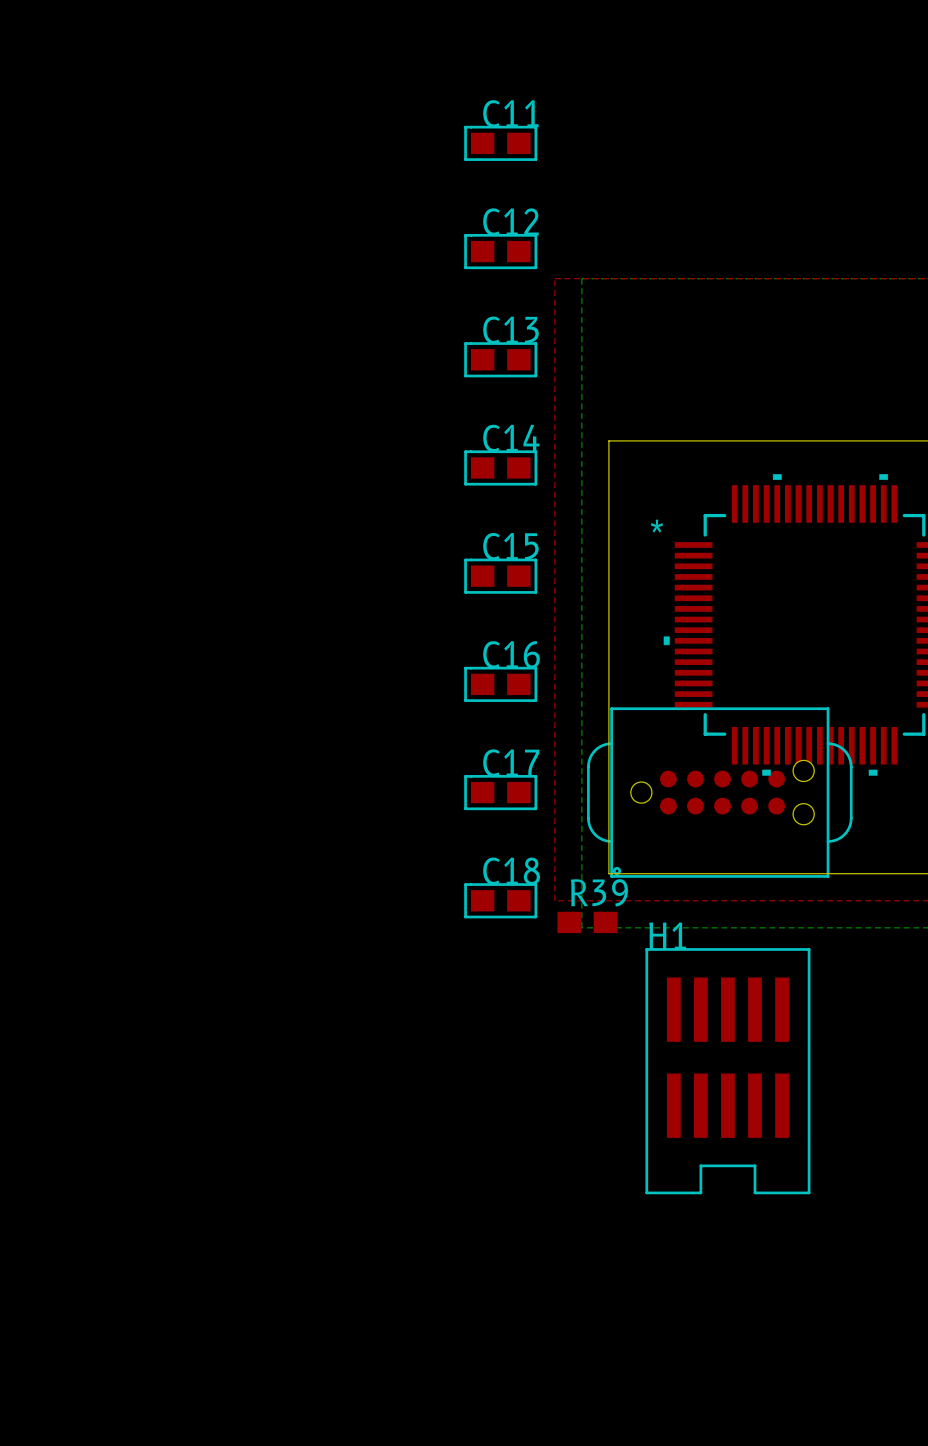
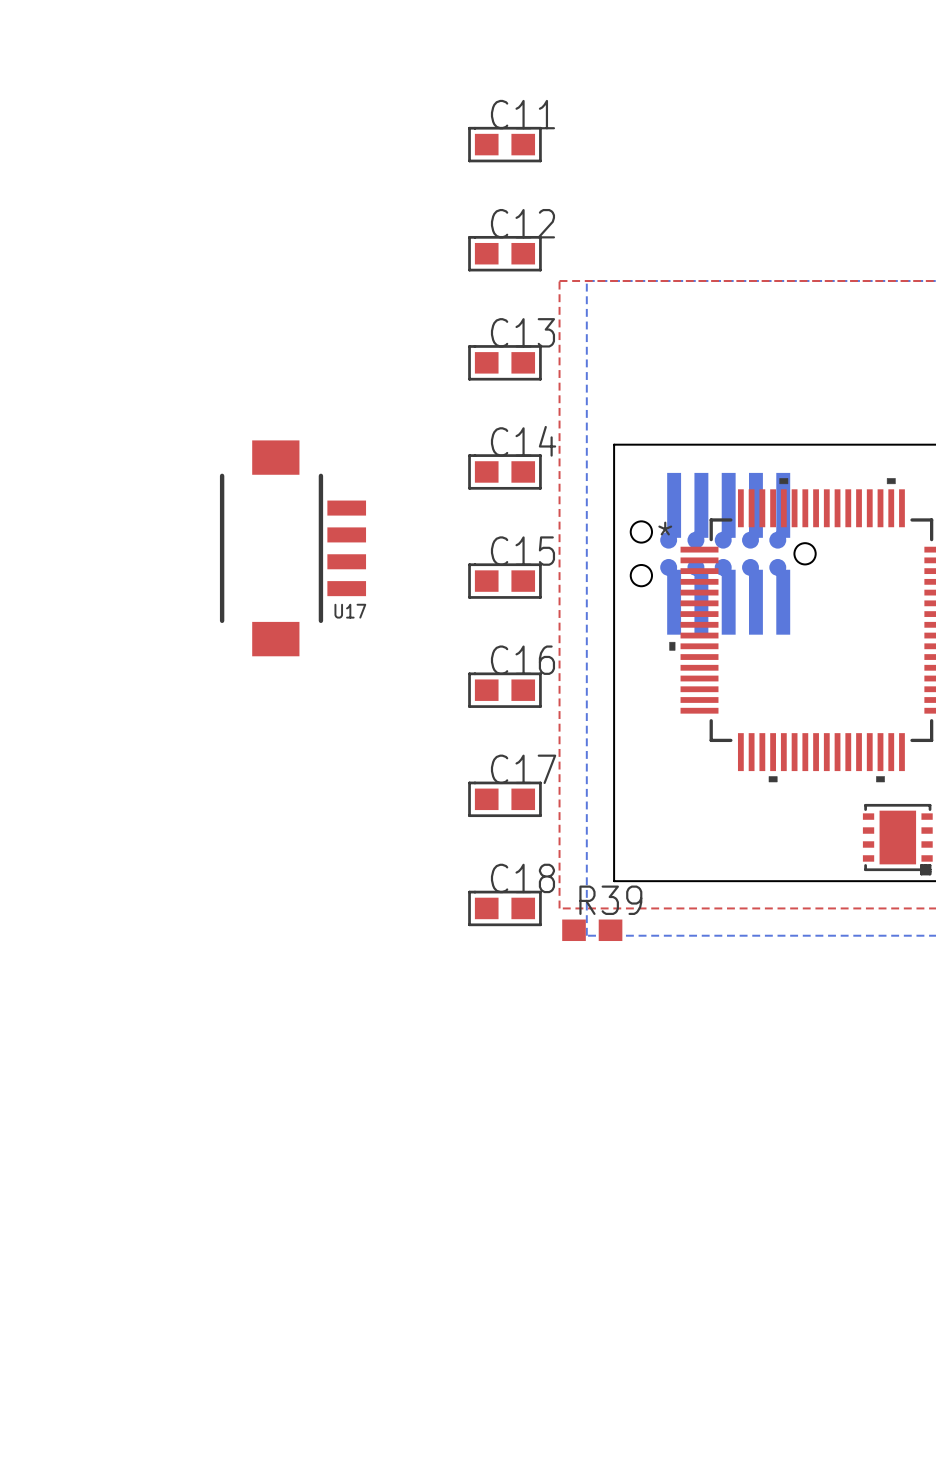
U17: none -> (292, 548)
part side: top (719, 792) -> bottom (723, 553)
part: none -> (897, 839)
H1 side: top (727, 1071) -> bottom (728, 553)

